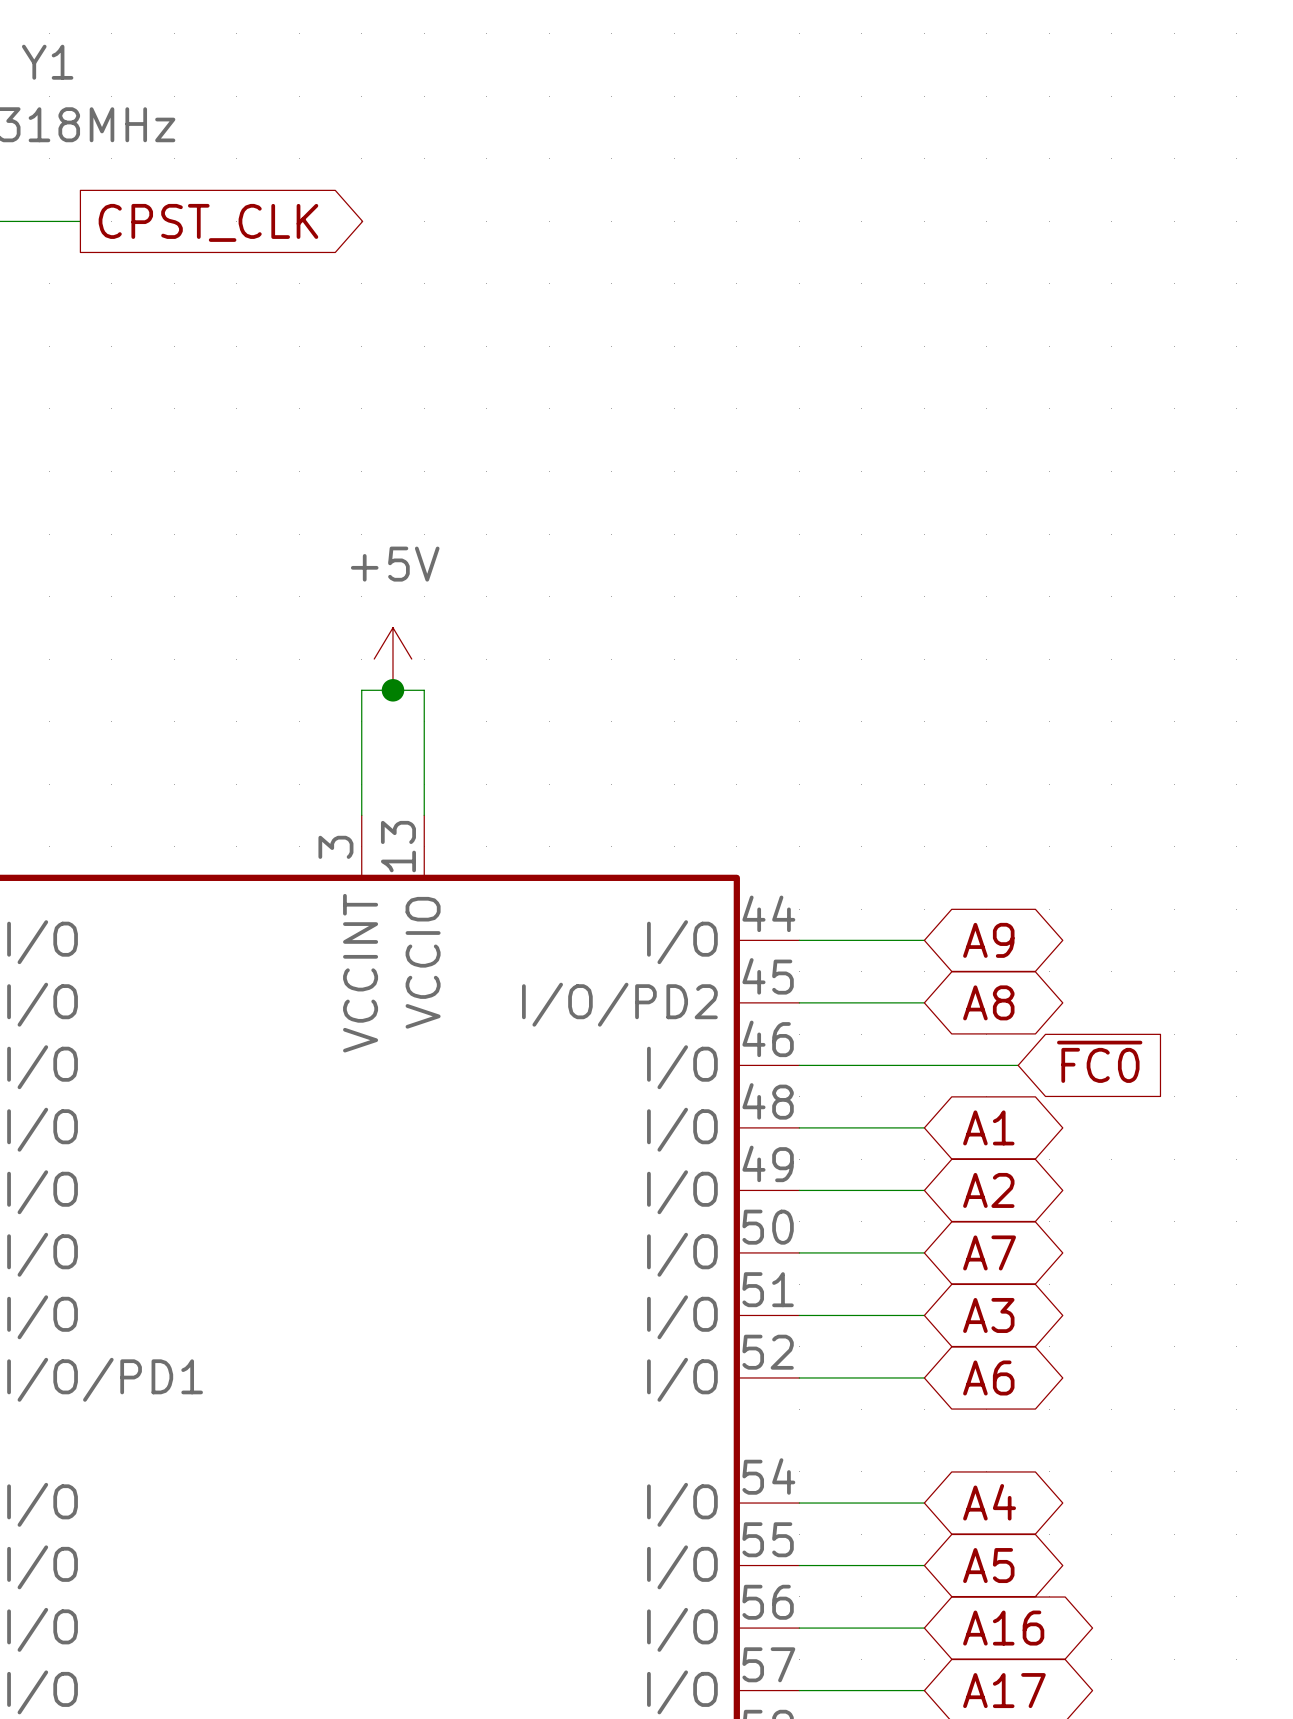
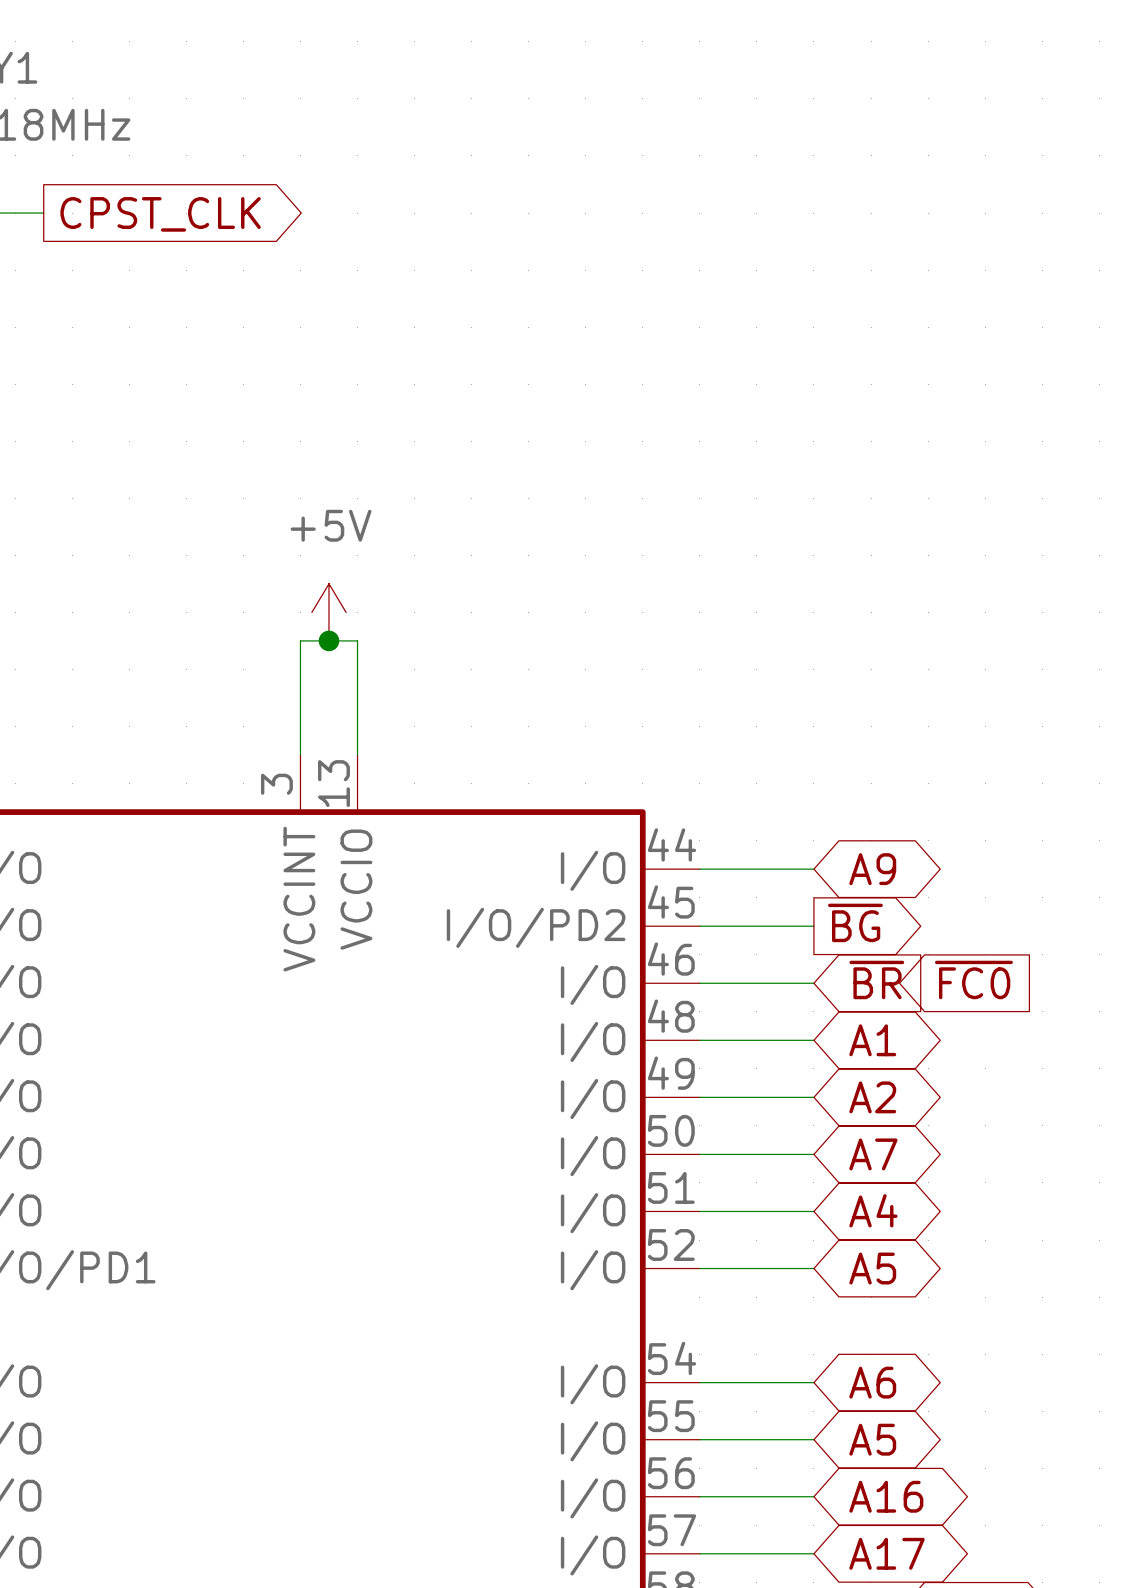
global label shape: bidirectional (988, 1002) -> output (855, 922)
global label: A8 (988, 1002) -> ~{BG} (855, 922)
global label: none -> ~{BR} (876, 979)
wire: (924, 1065) (1018, 1065) -> none
global label: A3 (988, 1315) -> A4 (873, 1210)
global label: A6 (988, 1377) -> A5 (872, 1268)
global label: A4 (989, 1502) -> A6 (872, 1382)

